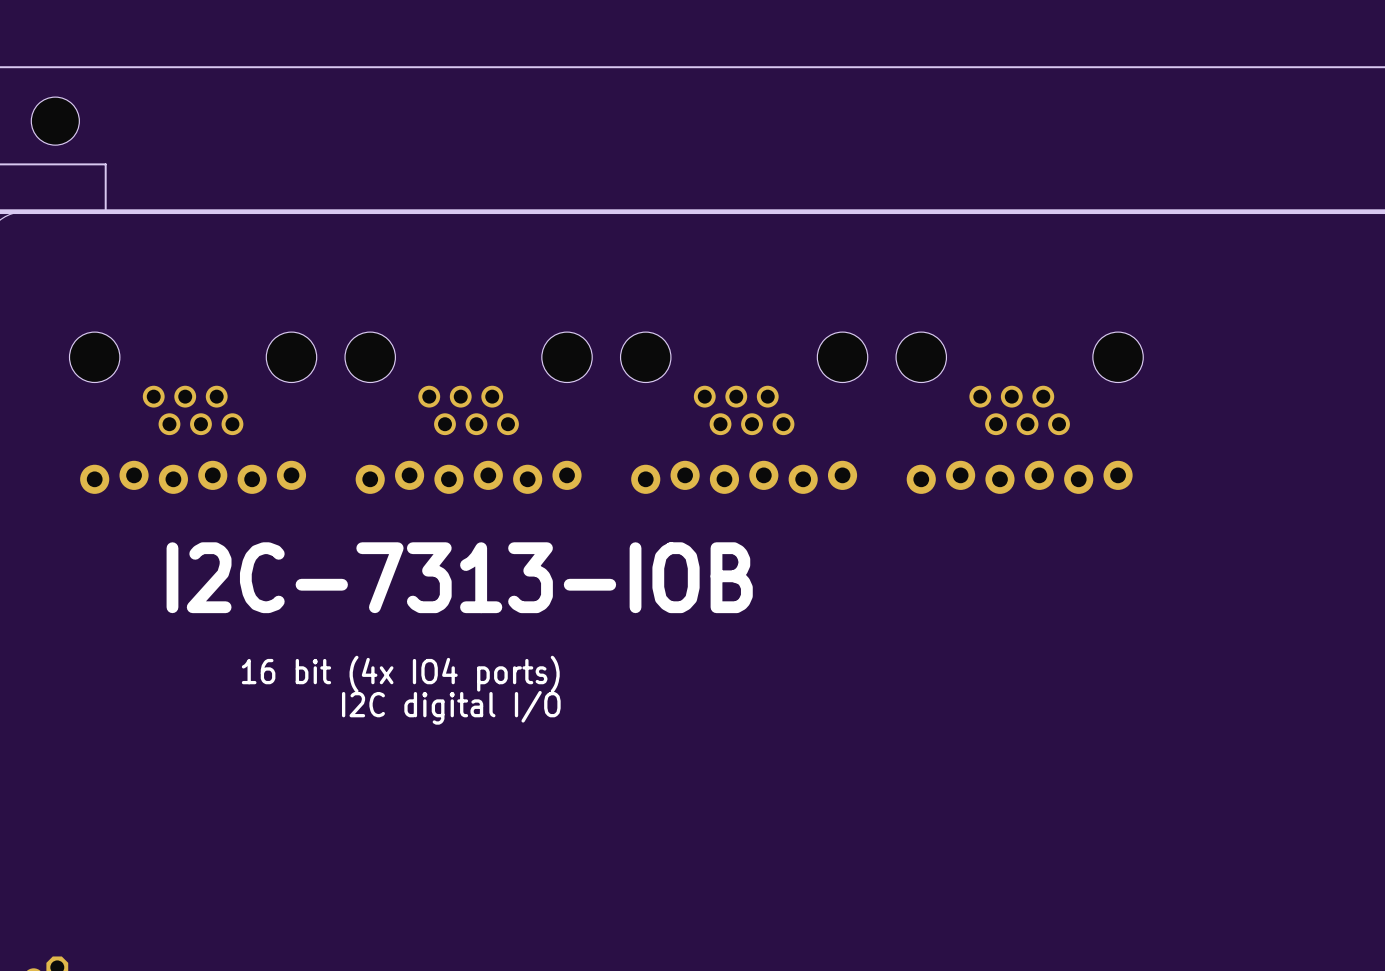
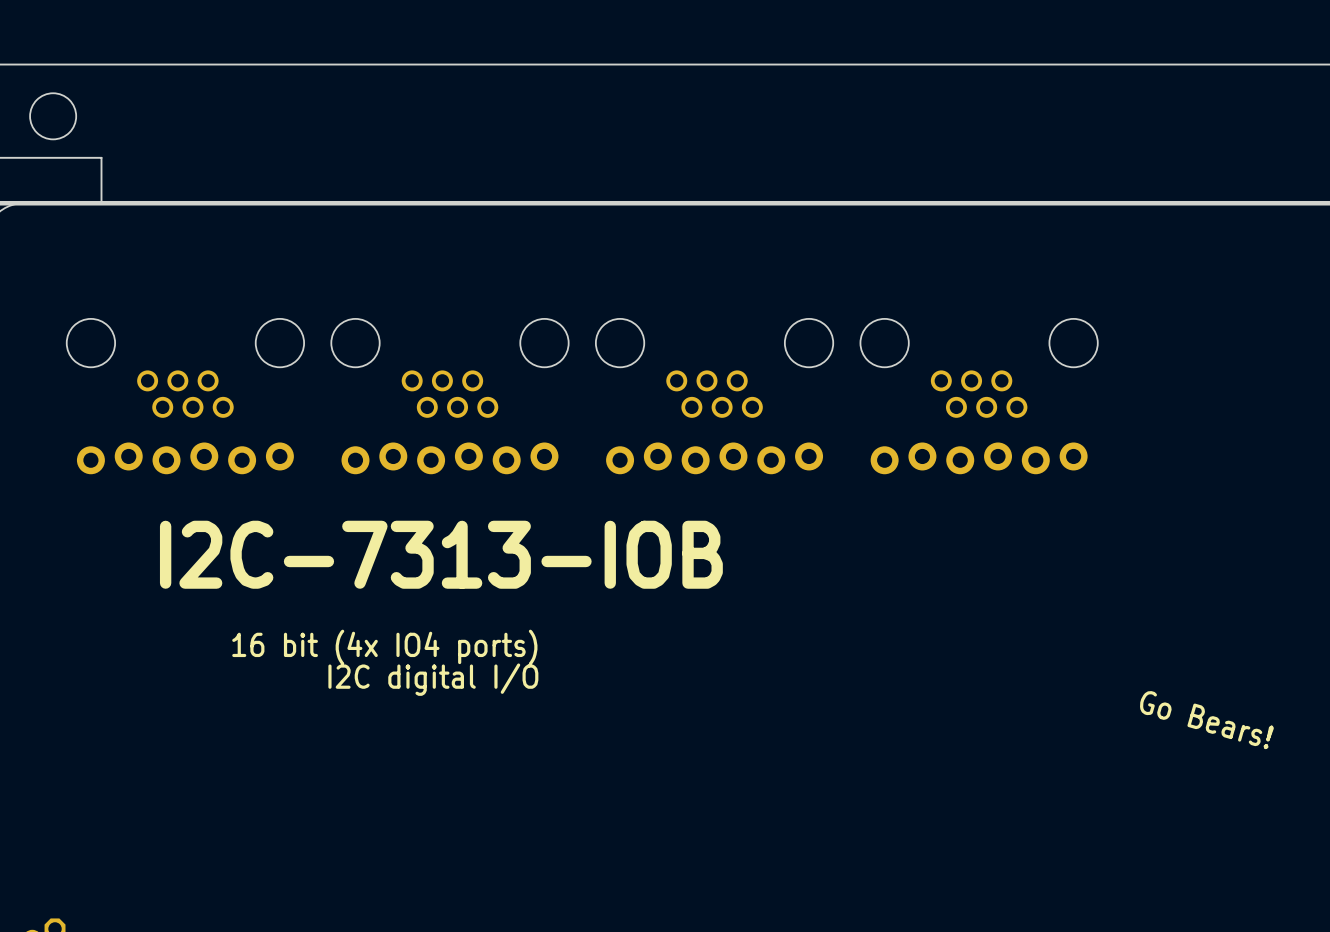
text: none -> Go Bears! (1206, 720)

